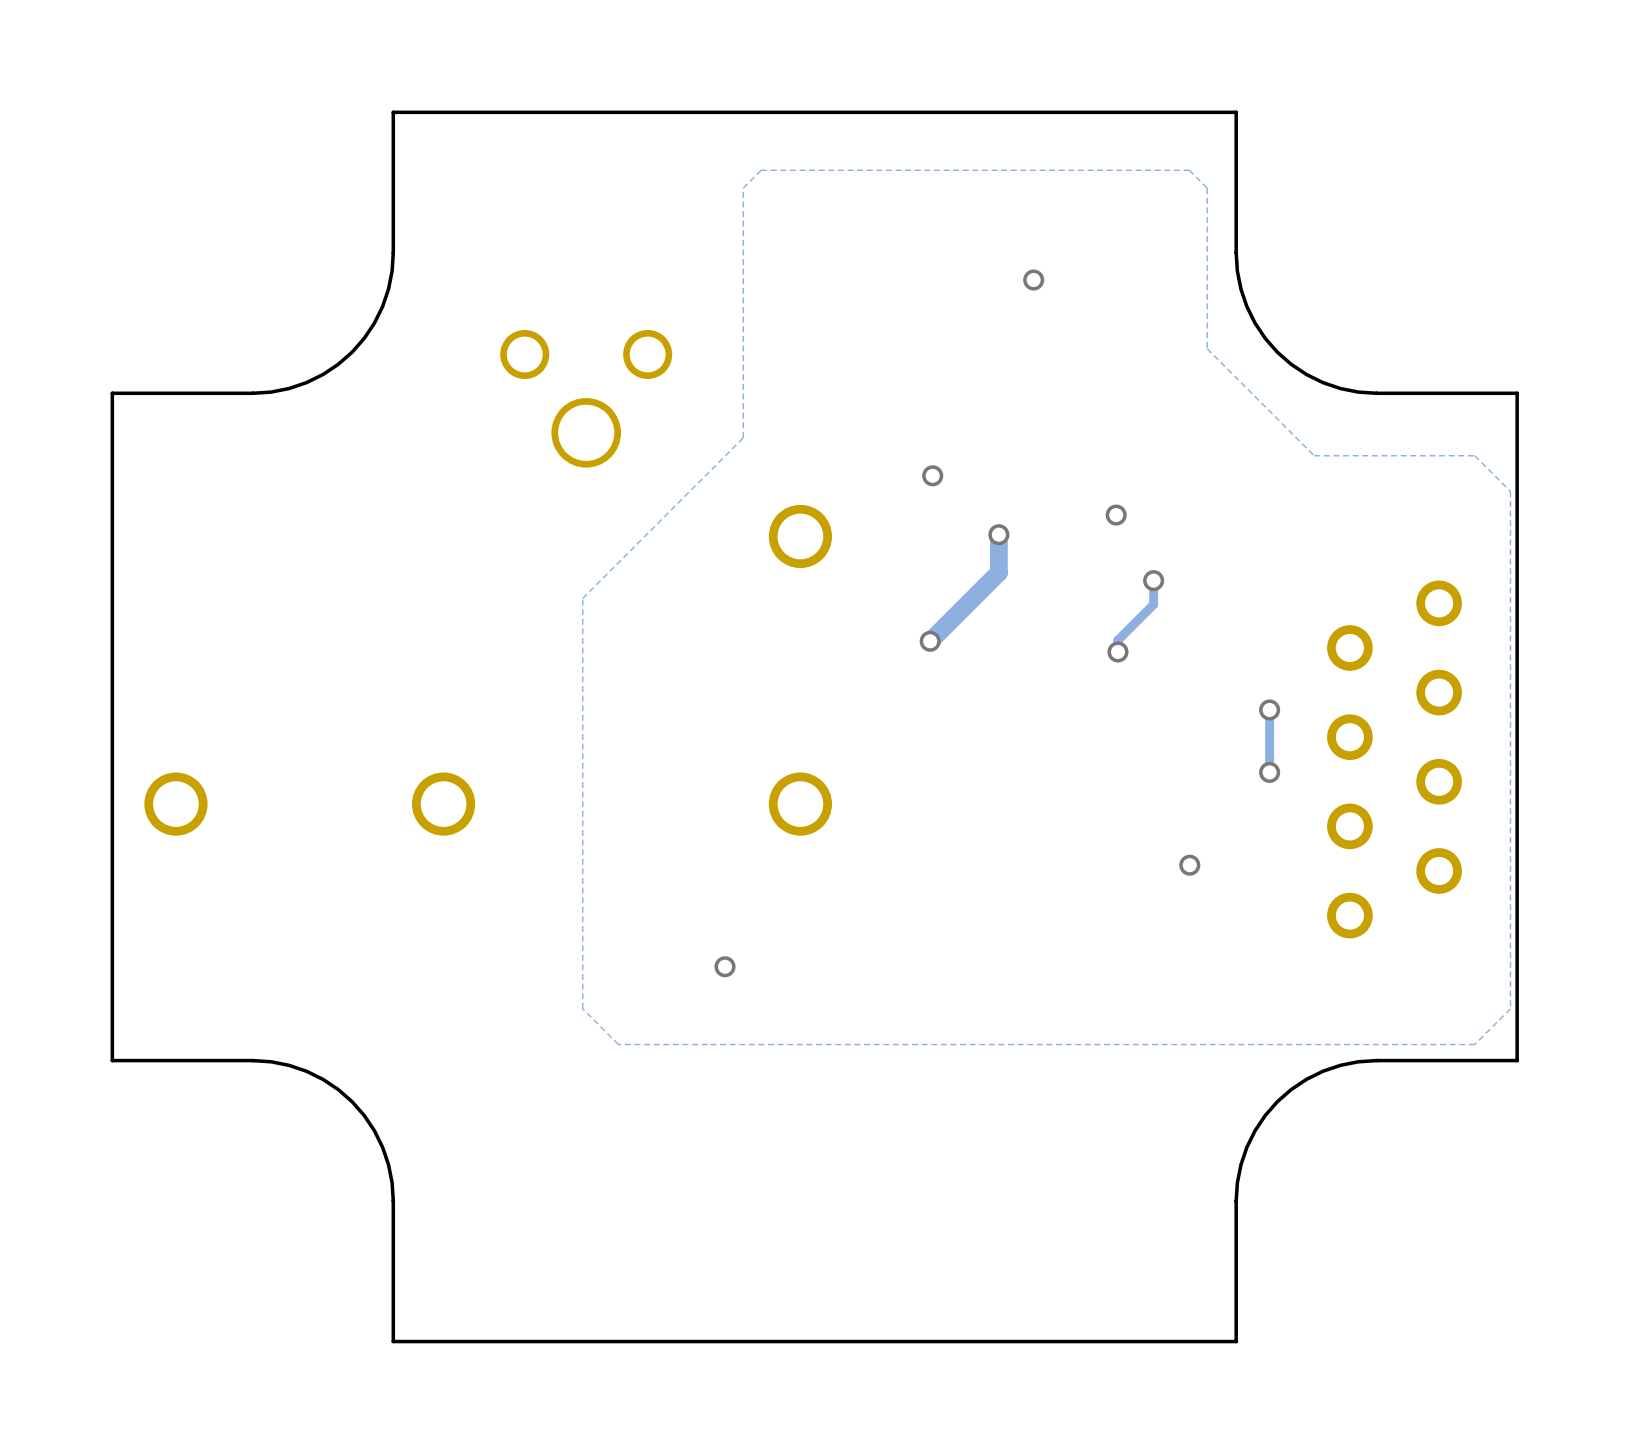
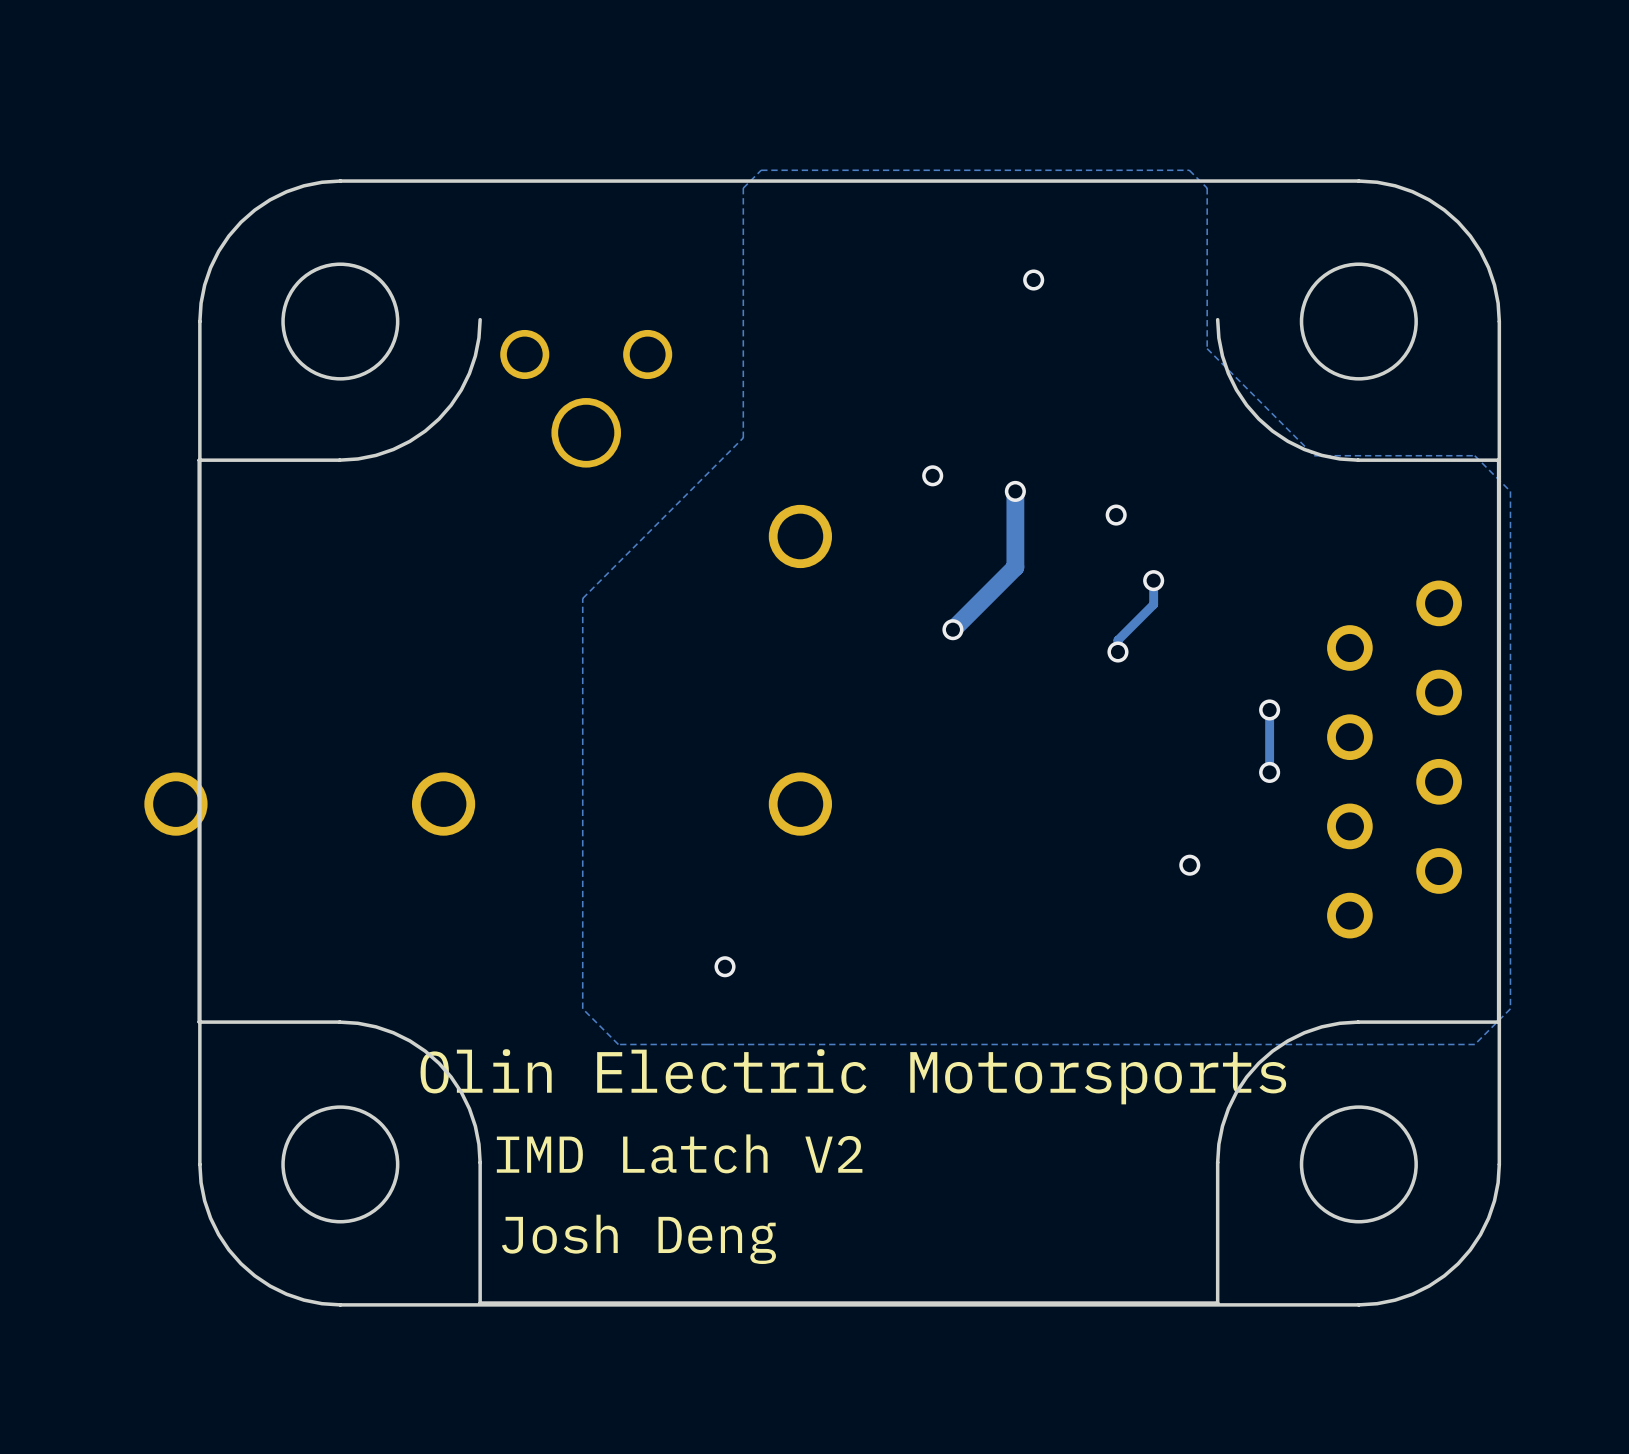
board edge: (1236, 112) (393, 112) (392, 271) (382, 306) (374, 323) (352, 352) (338, 364) (306, 382) (271, 392) (112, 393) (112, 1060) (271, 1061) (306, 1071) (338, 1089) (352, 1101) (374, 1130) (382, 1147) (392, 1182) (393, 1341) (1236, 1341) (1237, 1182) (1246, 1147) (1255, 1130) (1277, 1101) (1291, 1089) (1322, 1071) (1358, 1061) (1517, 1060) (1517, 393) (1358, 392) (1322, 382) (1291, 364) (1277, 352) (1255, 323) (1246, 306) (1237, 271) (1236, 112) -> (1358, 181) (1395, 185) (1412, 191) (1444, 210) (1470, 236) (1480, 251) (1488, 267) (1498, 303) (1499, 1164) (1494, 1200) (1488, 1218) (1480, 1234) (1458, 1263) (1444, 1275) (1412, 1294) (1395, 1300) (1358, 1304) (340, 1304) (303, 1300) (286, 1294) (254, 1275) (241, 1263) (218, 1234) (210, 1218) (204, 1200) (199, 1164) (199, 321) (204, 285) (210, 267) (218, 251) (241, 222) (254, 210) (286, 191) (303, 185) (340, 181) (1358, 181)
round board edge: none -> [281, 262, 400, 381]
round board edge: none -> [1299, 262, 1418, 381]
board edge: none -> (1217, 319) (1222, 356) (1236, 389) (1258, 419) (1287, 441) (1321, 455) (1339, 458) (1498, 460) (1498, 1022) (1339, 1023) (1304, 1032) (1272, 1051) (1258, 1063) (1236, 1092) (1228, 1108) (1218, 1144) (1217, 1303) (480, 1303) (478, 1144) (469, 1108) (461, 1092) (439, 1063) (425, 1051) (393, 1032) (358, 1023) (199, 1022) (199, 460) (358, 458) (376, 455) (409, 441) (439, 419) (461, 389) (475, 356) (480, 319)
track: none -> (1015, 491) (1015, 567) (952, 629)
track: (998, 534) (998, 572) (930, 641) -> none
via position: (998, 534) -> (1015, 491)
via position: (930, 641) -> (952, 629)
text: none -> Olin Electric Motorsports (853, 1076)
round board edge: none -> [281, 1105, 400, 1224]
round board edge: none -> [1299, 1105, 1418, 1224]
text: none -> IMD Latch V2 (679, 1153)
text: none -> Josh Deng (638, 1239)

